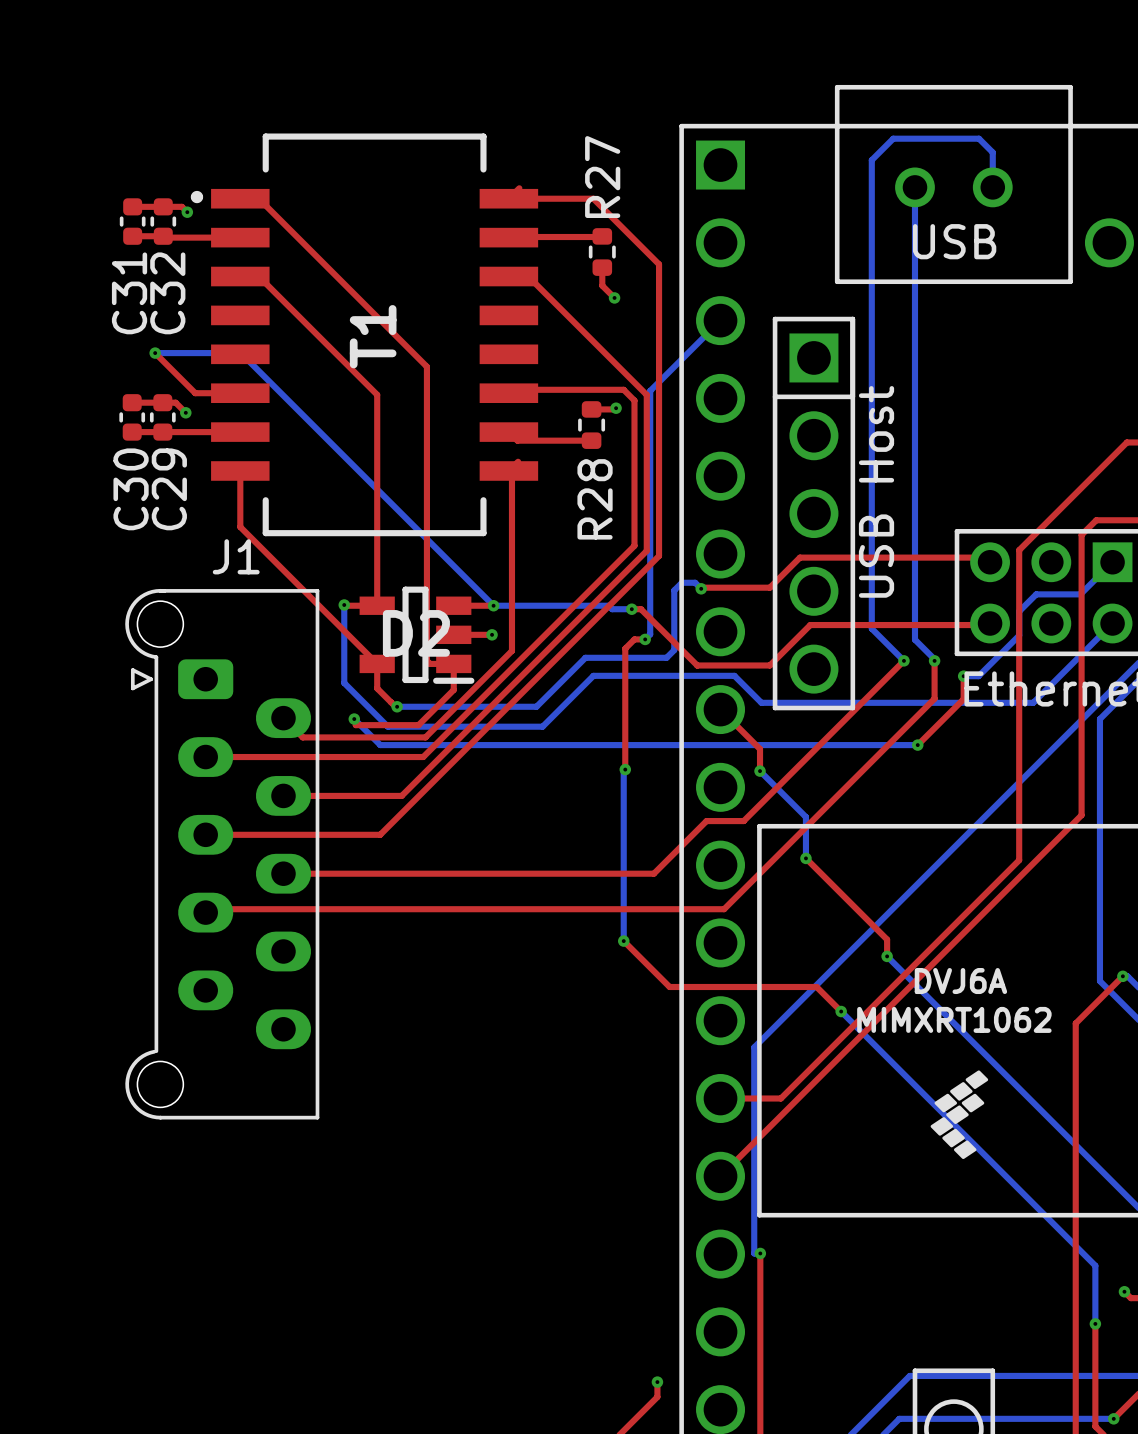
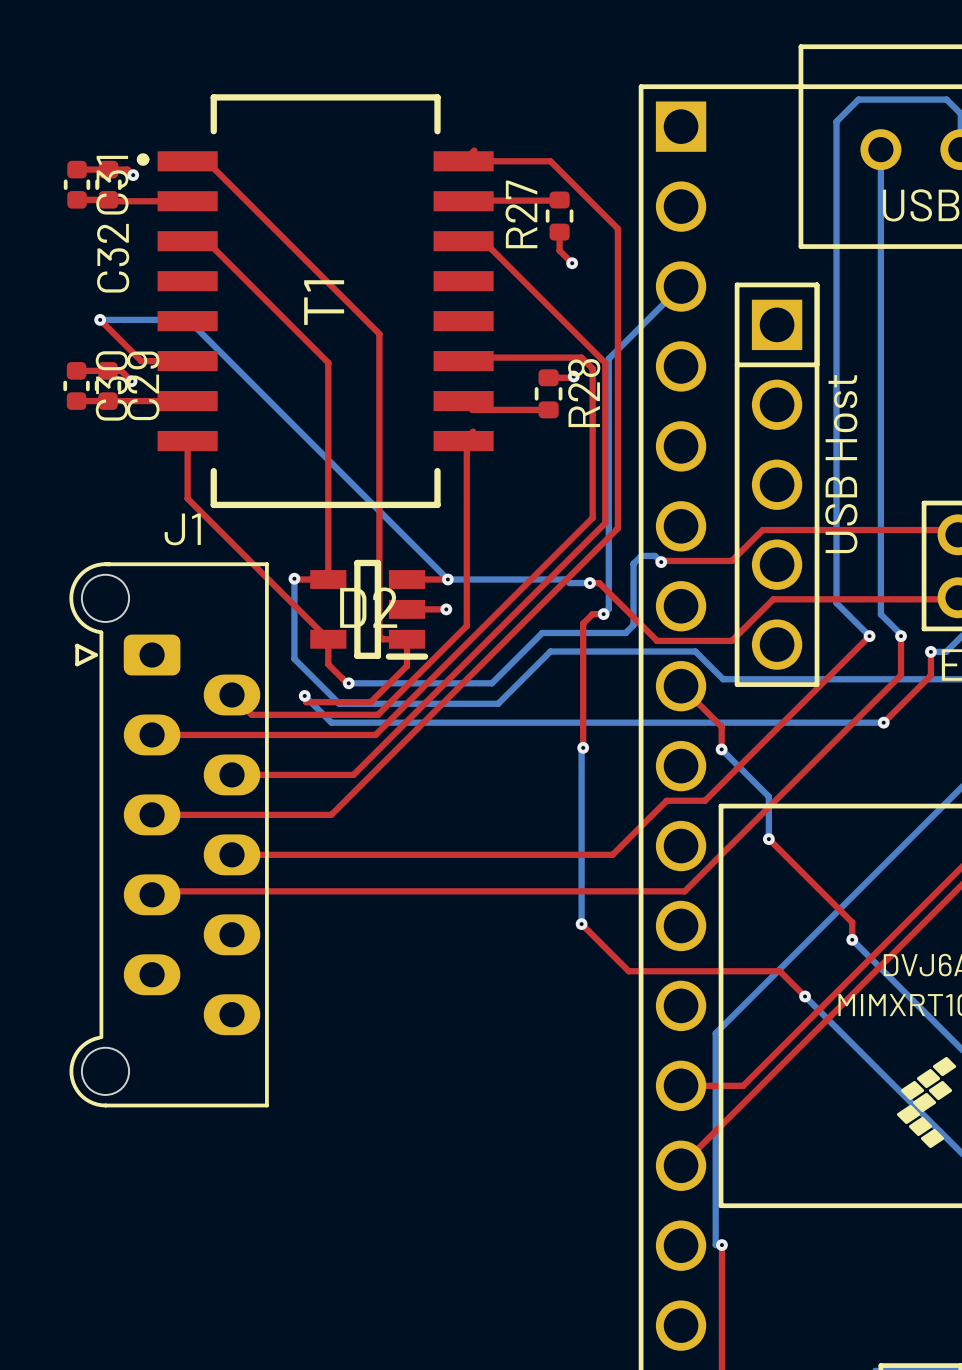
R27 name position: R27 (602, 177) -> R27 (521, 214)
C31 name position: C31 (129, 293) -> C31 (112, 185)
C30 name position: C30 (131, 489) -> C30 (111, 385)
C29 name position: C29 (169, 489) -> C29 (143, 385)
R28 name position: R28 (595, 499) -> R28 (584, 393)

